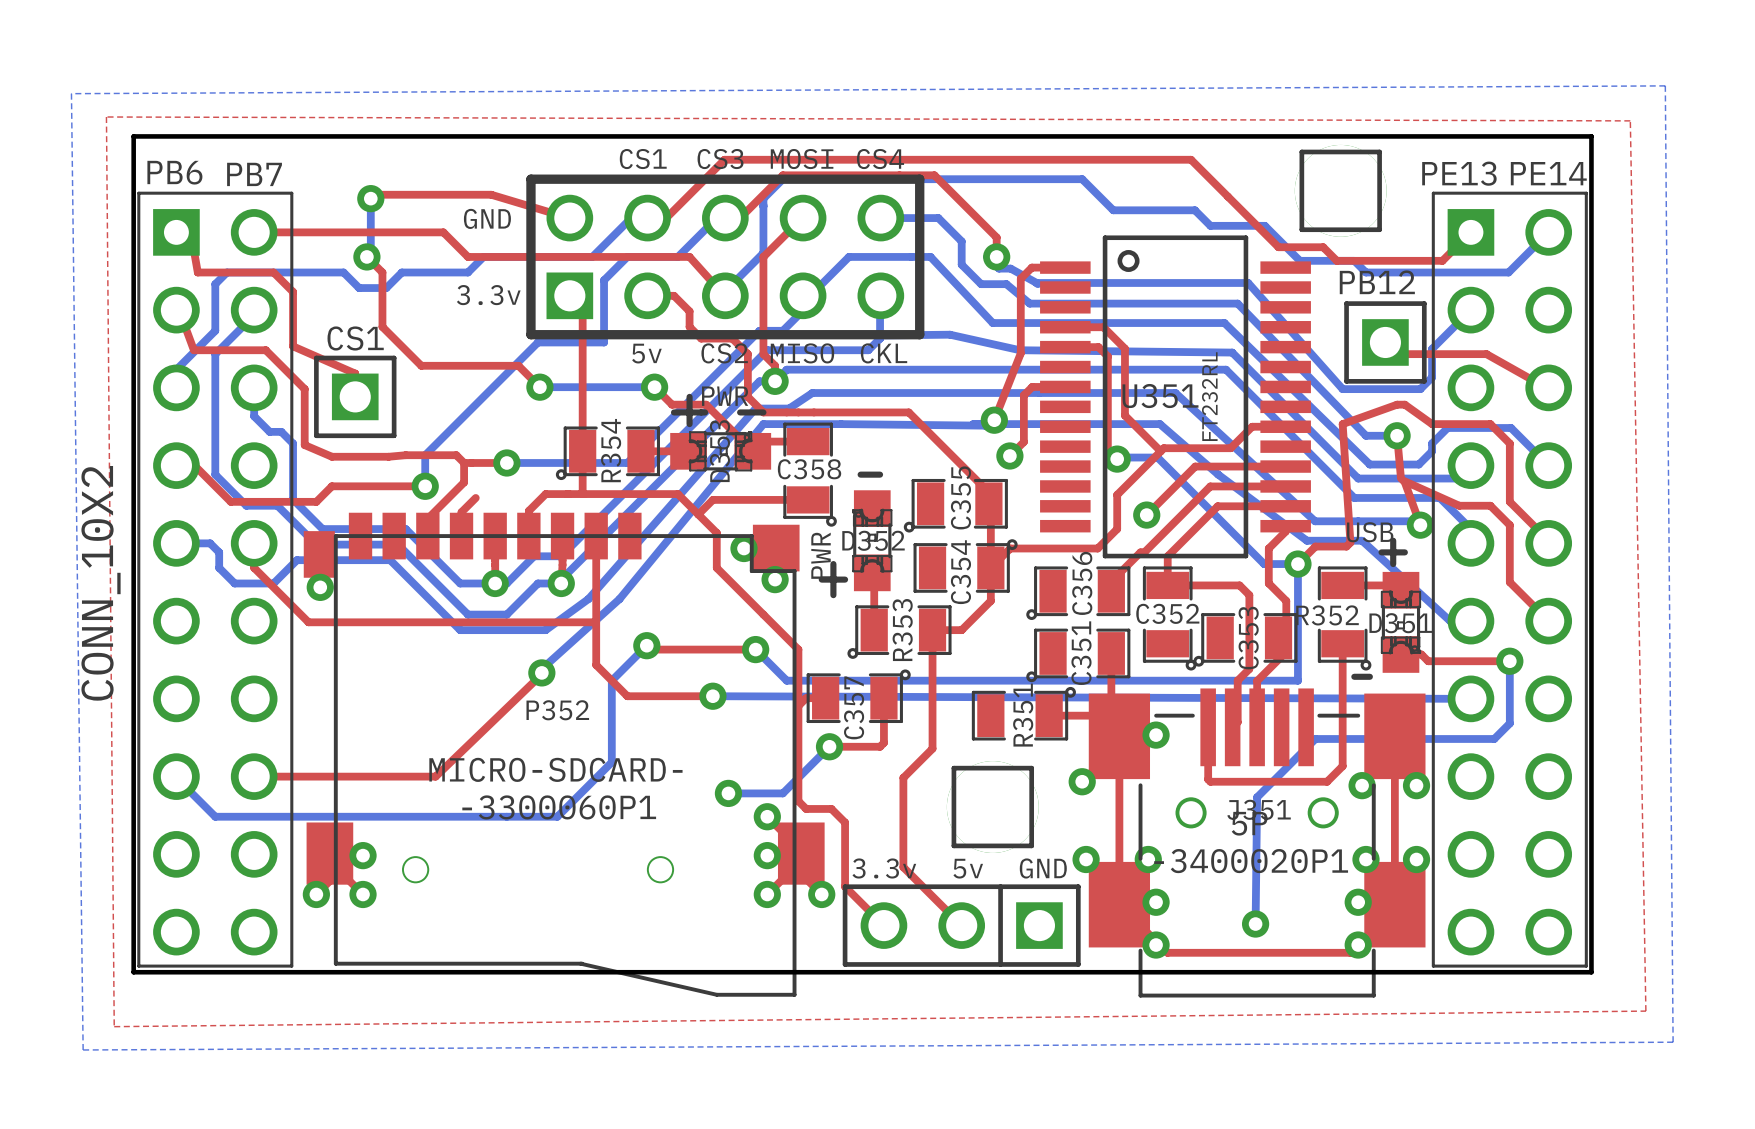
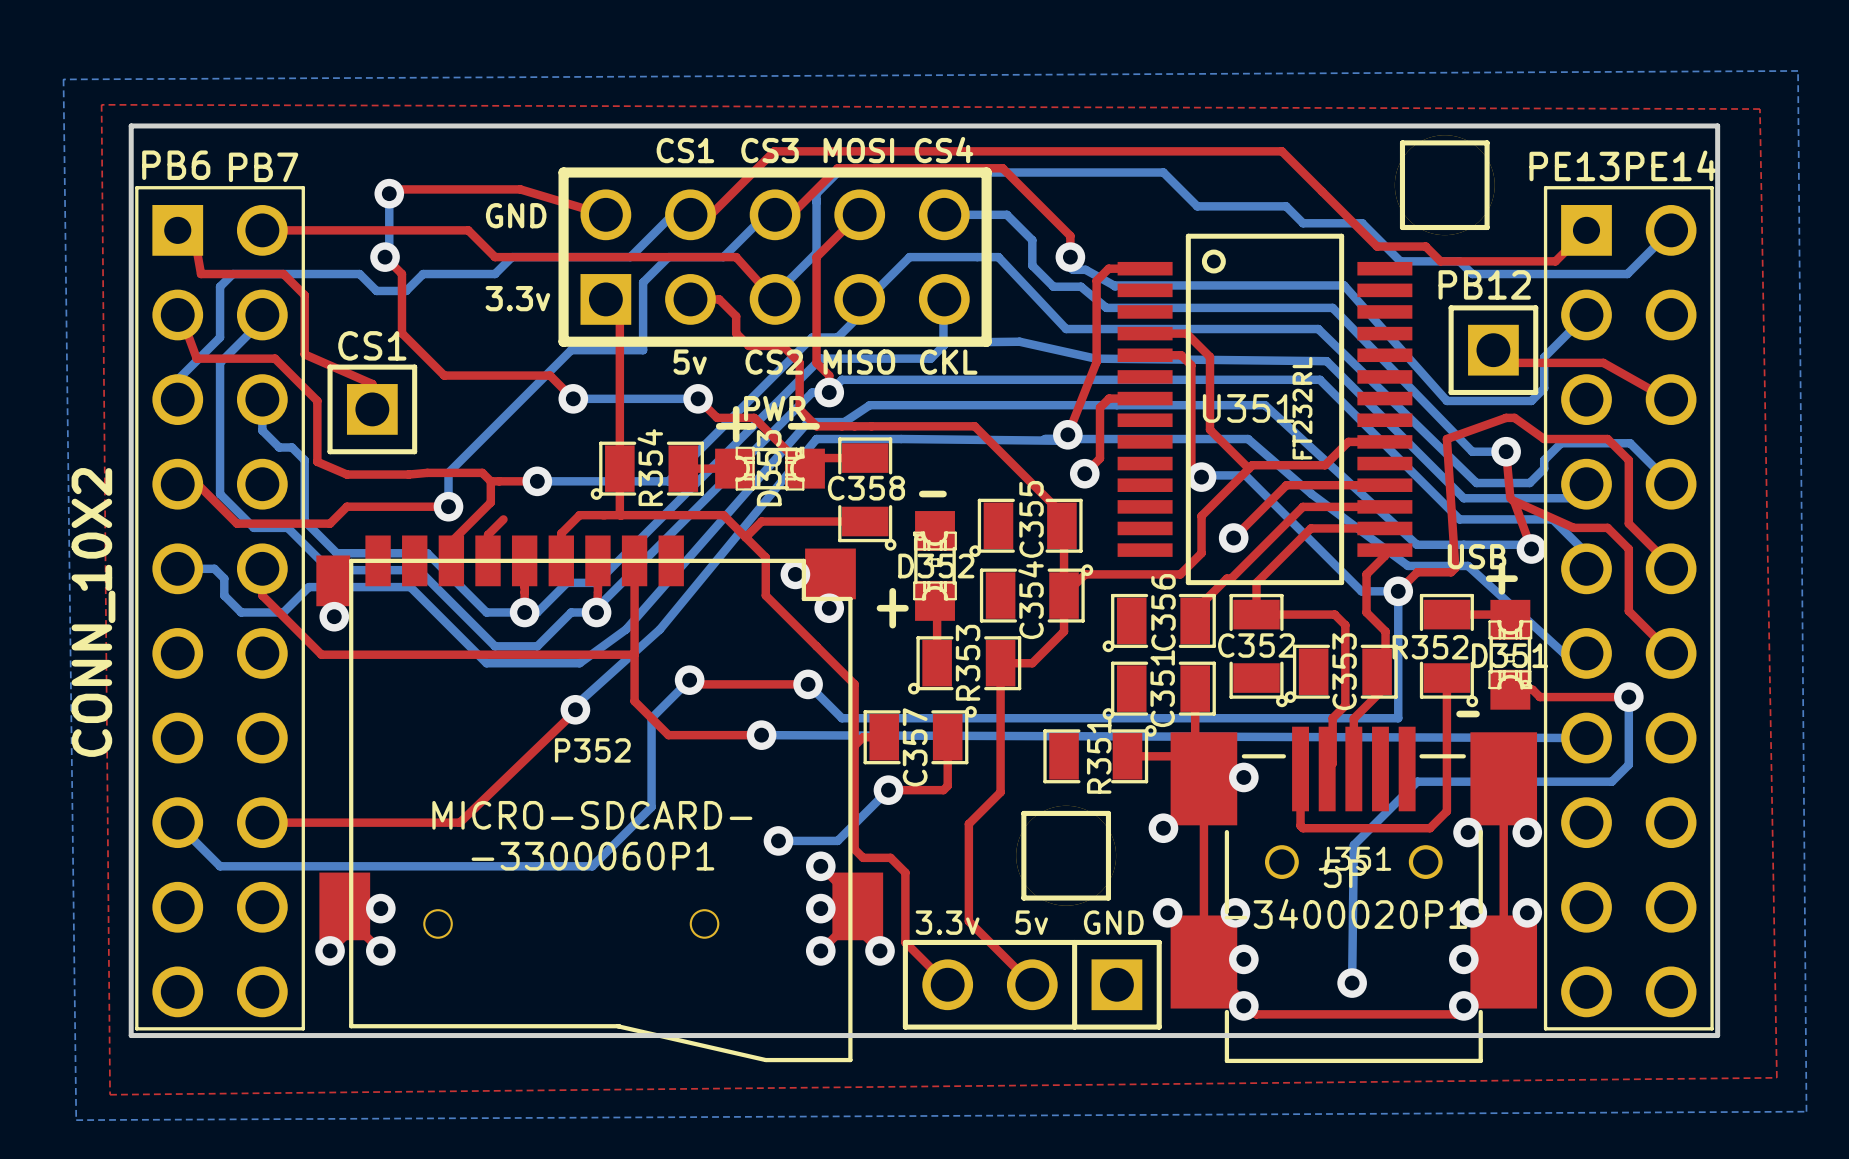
text: PWR (821, 555) -> none

